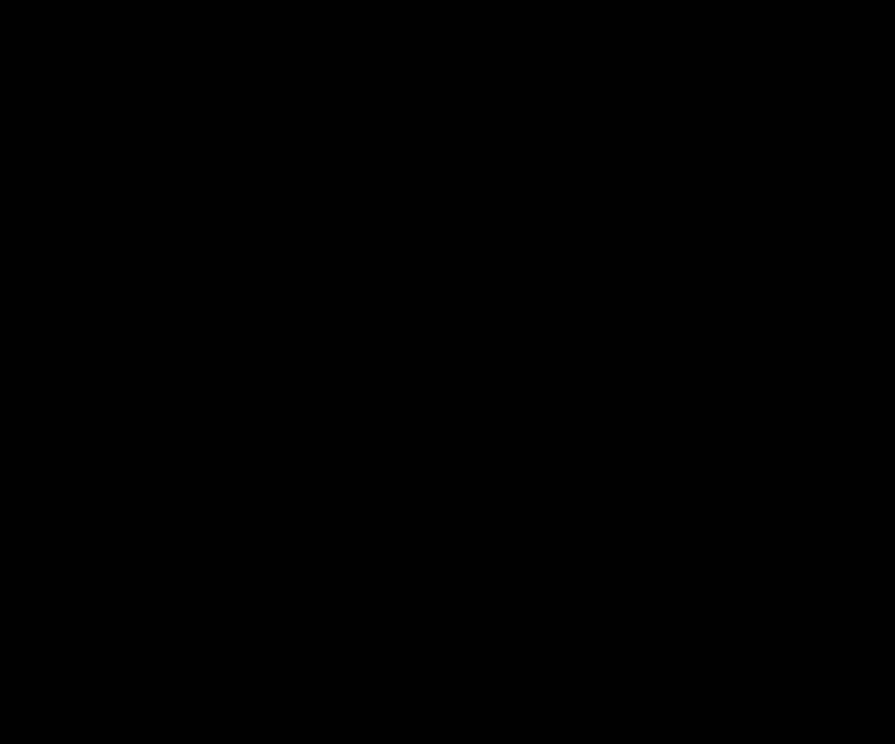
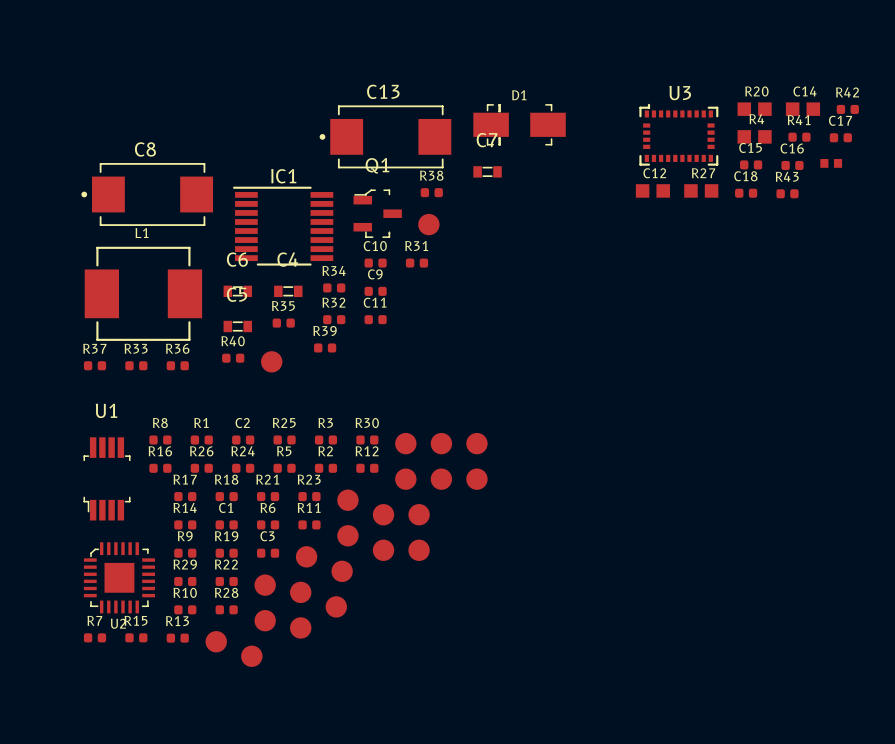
R20: none -> (754, 109)
C14: none -> (802, 109)
R42: none -> (847, 109)
D1: none -> (519, 124)
U3: none -> (678, 134)
C13: none -> (385, 136)
R4: none -> (754, 136)
R41: none -> (799, 137)
C17: none -> (840, 137)
part: none -> (831, 163)
C15: none -> (751, 164)
C16: none -> (792, 165)
C7: none -> (487, 171)
C12: none -> (652, 190)
R27: none -> (701, 190)
R38: none -> (431, 192)
C18: none -> (746, 193)
R43: none -> (787, 193)
C8: none -> (147, 194)
Q1: none -> (377, 213)
part: none -> (428, 224)
IC1: none -> (283, 226)
C10: none -> (375, 263)
R31: none -> (417, 263)
R34: none -> (334, 287)
C6: none -> (237, 291)
C4: none -> (288, 291)
C9: none -> (375, 291)
L1: none -> (143, 293)
R32: none -> (334, 319)
C11: none -> (375, 319)
R35: none -> (283, 323)
C5: none -> (237, 326)
R39: none -> (325, 347)
R40: none -> (233, 358)
part: none -> (271, 361)
R37: none -> (94, 365)
R33: none -> (136, 365)
R36: none -> (177, 365)
R8: none -> (160, 439)
R1: none -> (201, 439)
C2: none -> (243, 439)
R25: none -> (284, 439)
R3: none -> (325, 439)
R30: none -> (367, 439)
part: none -> (405, 443)
part: none -> (441, 443)
part: none -> (476, 443)
R16: none -> (160, 468)
R26: none -> (201, 468)
R24: none -> (243, 468)
R5: none -> (284, 468)
R2: none -> (325, 468)
R12: none -> (367, 468)
U1: none -> (107, 478)
part: none -> (405, 479)
part: none -> (441, 479)
part: none -> (476, 479)
R17: none -> (185, 496)
R18: none -> (226, 496)
R21: none -> (268, 496)
R23: none -> (309, 496)
part: none -> (347, 500)
part: none -> (383, 514)
part: none -> (419, 514)
R14: none -> (185, 524)
C1: none -> (226, 524)
R6: none -> (268, 524)
R11: none -> (309, 524)
part: none -> (347, 535)
part: none -> (383, 550)
part: none -> (419, 550)
R9: none -> (185, 553)
R19: none -> (226, 553)
C3: none -> (268, 553)
part: none -> (306, 556)
part: none -> (342, 571)
U2: none -> (119, 577)
R29: none -> (185, 581)
R22: none -> (226, 581)
part: none -> (265, 585)
part: none -> (300, 592)
part: none -> (336, 606)
R10: none -> (185, 609)
R28: none -> (226, 609)
part: none -> (265, 620)
part: none -> (300, 627)
R7: none -> (94, 637)
R15: none -> (136, 637)
R13: none -> (177, 638)
part: none -> (216, 641)
part: none -> (251, 656)

